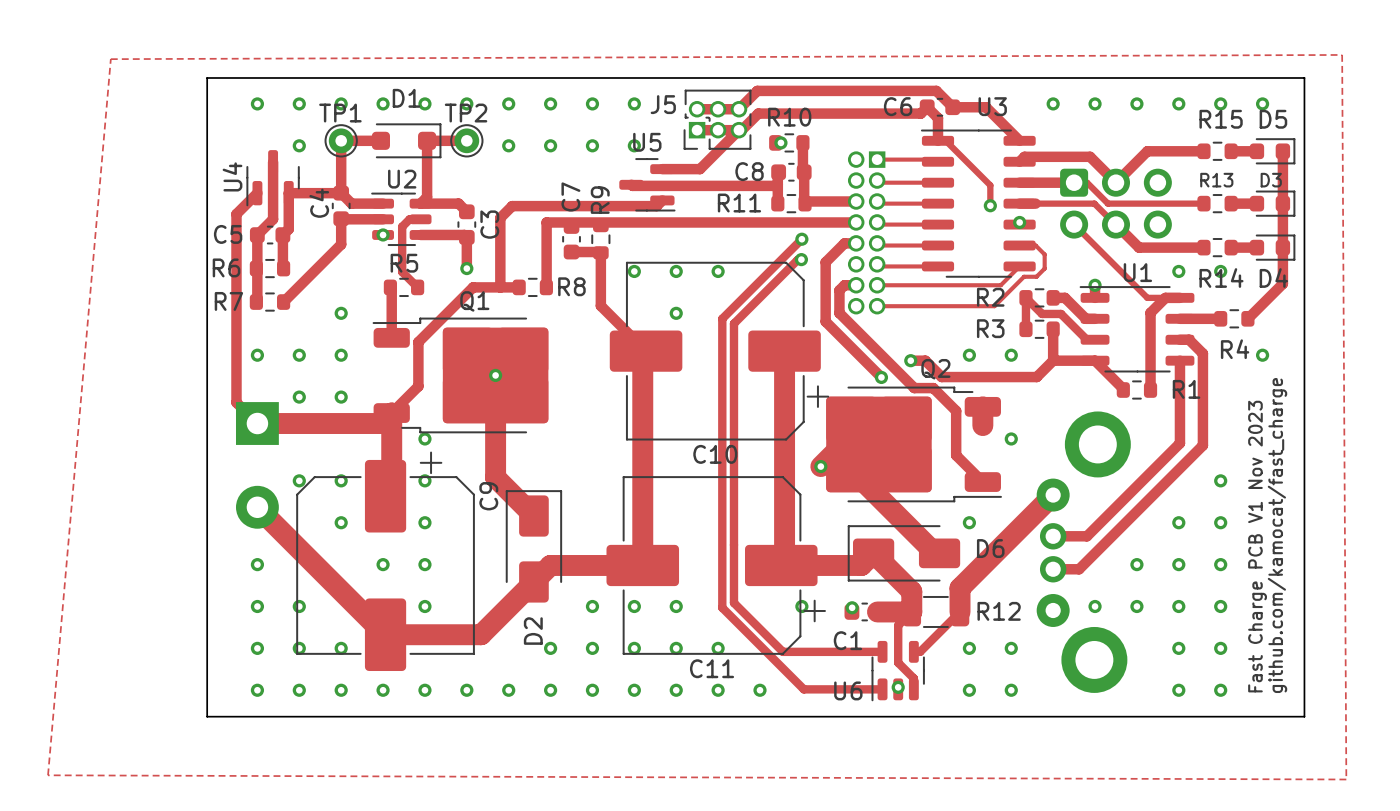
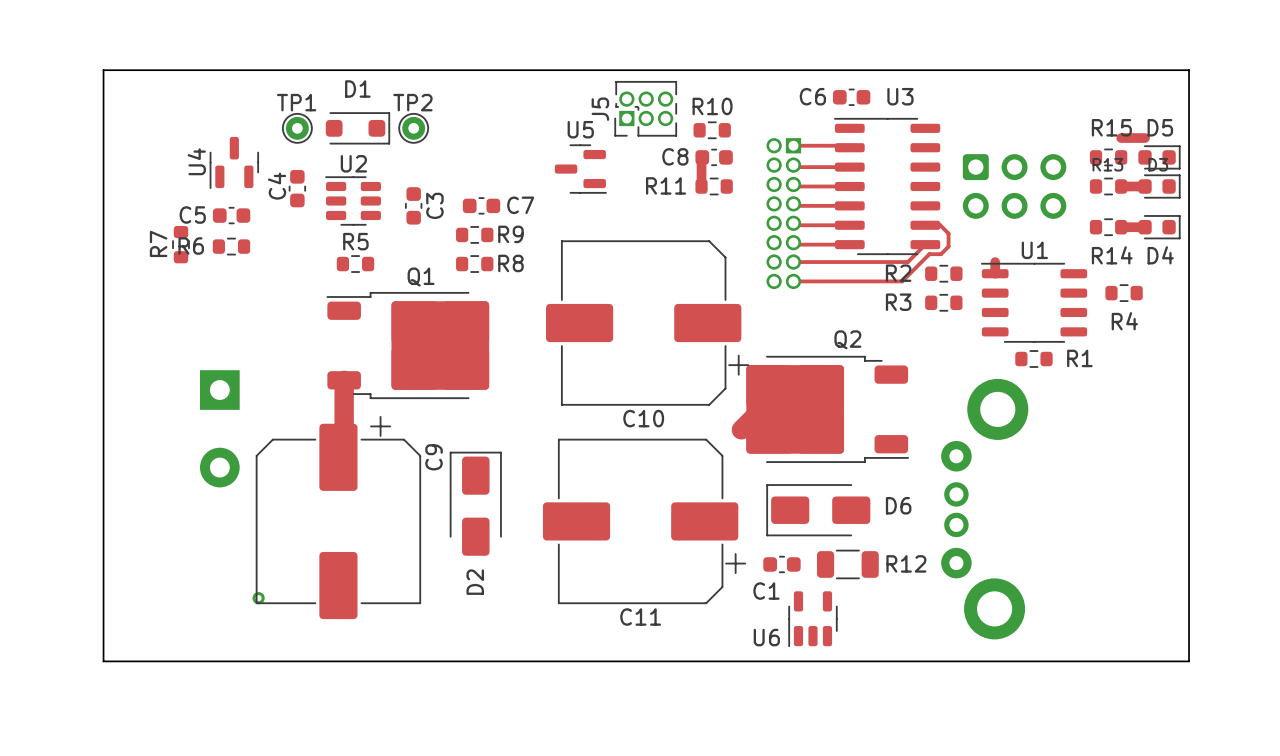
zone outline: (1342, 54) (110, 59) (48, 775) (1346, 779) (1342, 54) -> none
board edge: (207, 77) (207, 716) -> (173, 70) (103, 70) (103, 661) (173, 661)
via: (257, 103) -> none
via: (299, 103) -> none
via: (341, 103) -> none
via: (383, 103) -> none
via: (424, 103) -> none
via: (466, 103) -> none
via: (508, 103) -> none
via: (550, 103) -> none
via: (592, 103) -> none
via: (634, 103) -> none
via: (1053, 103) -> none
via: (1095, 103) -> none
via: (1136, 103) -> none
via: (1178, 103) -> none
via: (1220, 103) -> none
via: (1262, 103) -> none
J5 name rotation: 0° (663, 104) -> 90° counterclockwise (600, 109)
track: (697, 109) (738, 109) (757, 90) (936, 90) (952, 107) (986, 107) (1019, 140) -> none
track: (697, 130) (741, 130) (758, 113) (920, 113) (927, 107) (937, 118) (937, 140) (945, 140) (990, 185) (990, 205) -> none
track: (738, 130) (700, 169) (662, 169) -> none
track: (380, 140) (341, 140) (341, 193) -> none
track: (466, 140) (427, 140) (427, 197) (420, 203) (458, 203) (466, 211) -> none
via: (780, 142) -> none
track: (802, 142) (804, 202) (856, 201) -> none
via: (299, 145) -> none
via: (508, 145) -> none
via: (550, 145) -> none
via: (592, 145) -> none
via: (634, 145) -> none
track: (1203, 151) (1147, 151) (1115, 182) (1090, 156) (1024, 156) (1019, 161) -> none
R15 position: (1217, 151) -> (1108, 157)
D5 position: (1272, 151) -> (1159, 157)
track: (1282, 151) (1282, 283) (1247, 318) -> none
track: (273, 162) (273, 219) (257, 235) (256, 302) -> none
track: (1019, 182) (1087, 182) (1108, 203) (1203, 203) -> none
track: (631, 184) (777, 184) -> none
track: (257, 193) (236, 214) (236, 402) (257, 423) (381, 423) (418, 386) (418, 342) (473, 287) (519, 287) -> none
track: (341, 193) (288, 193) (288, 229) (281, 236) -> none
track: (341, 193) (351, 203) (383, 203) -> none
track: (662, 200) (656, 206) (512, 206) (500, 217) (500, 287) -> none
track: (1035, 203) (1019, 203) (1094, 203) (1139, 247) (1203, 247) -> none
via: (990, 205) -> none
track: (383, 219) (341, 218) (341, 244) (283, 302) -> none
track: (420, 219) (409, 219) (402, 226) (402, 271) (417, 287) -> none
track: (856, 222) (546, 222) (546, 287) -> none
via: (1019, 222) -> none
track: (1074, 224) (1147, 297) (1179, 297) (1165, 297) (1150, 312) (1150, 390) -> none
via: (383, 234) -> none
track: (420, 234) (464, 234) (466, 237) (466, 268) -> none
track: (282, 235) (283, 268) -> none
C7 rotation: 0° (571, 239) -> 90° clockwise (481, 205)
C7 position: (571, 239) -> (481, 205)
R9 rotation: 0° (600, 239) -> 90° clockwise (474, 234)
R9 position: (600, 239) -> (474, 234)
track: (801, 239) (722, 318) (722, 607) (803, 689) (882, 689) -> none
via: (801, 239) -> none
track: (856, 243) (844, 243) (825, 262) (825, 321) (881, 377) -> none
track: (571, 252) (600, 252) (600, 305) (646, 351) (642, 354) (642, 565) (550, 565) (481, 634) (384, 634) (257, 507) -> none
track: (801, 259) (797, 259) (733, 323) (733, 602) (782, 651) (882, 651) -> none
via: (801, 259) -> none
via: (466, 268) -> none
via: (634, 271) -> none
via: (676, 271) -> none
via: (718, 271) -> none
via: (1178, 271) -> none
via: (1220, 271) -> none
track: (856, 285) (844, 285) (839, 290) (839, 313) (914, 388) (933, 388) (956, 410) (956, 455) (982, 482) -> none
via: (1095, 285) -> none
track: (390, 287) (391, 337) -> none
track: (1053, 297) (1064, 297) (1085, 318) (1095, 318) -> none
R7 rotation: 0° (269, 302) -> 90° clockwise (180, 244)
R7 position: (269, 302) -> (180, 244)
via: (341, 313) -> none
via: (676, 313) -> none
track: (1179, 318) (1220, 318) -> none
track: (1025, 329) (1027, 299) (1042, 313) (1061, 313) (1086, 339) (1095, 339) -> none
track: (1053, 329) (1053, 360) -> none
track: (1179, 339) (1189, 339) (1202, 353) (1202, 445) (1079, 569) (1053, 569) -> none
track: (784, 351) (784, 562) (781, 565) (861, 565) (873, 553) (911, 591) (911, 611) -> none
via: (257, 355) -> none
via: (299, 355) -> none
via: (341, 355) -> none
via: (969, 355) -> none
via: (1011, 355) -> none
via: (1262, 355) -> none
track: (910, 360) (925, 360) (941, 377) (1036, 377) (1053, 360) -> none
via: (910, 360) -> none
track: (1053, 360) (1095, 360) (1123, 390) -> none
track: (1179, 360) (1179, 443) (1086, 536) (1053, 536) -> none
track: (495, 375) (495, 477) (533, 516) -> none
via: (495, 375) -> none
via: (881, 377) -> none
via: (299, 397) -> none
via: (341, 397) -> none
track: (982, 406) (982, 425) -> none
via: (424, 438) -> none
via: (1011, 438) -> none
via: (820, 466) -> none
track: (851, 469) (935, 553) (939, 553) -> none
via: (299, 480) -> none
via: (341, 480) -> none
via: (424, 480) -> none
via: (1220, 480) -> none
track: (1053, 495) (960, 588) (960, 611) (920, 651) (913, 651) -> none
via: (341, 522) -> none
via: (424, 522) -> none
via: (969, 522) -> none
via: (1178, 522) -> none
via: (1220, 522) -> none
text: github.com/kamocat/fast_charge (1277, 535) -> none
text: Fast Charge PCB V1 Nov 2023 (1257, 546) -> none
via: (257, 564) -> none
via: (383, 564) -> none
via: (424, 564) -> none
via: (1136, 564) -> none
via: (1178, 564) -> none
via: (1220, 564) -> none
via: (257, 606) -> none
via: (299, 606) -> none
via: (424, 606) -> none
via: (592, 606) -> none
via: (634, 606) -> none
via: (676, 606) -> none
via: (801, 606) -> none
via: (1095, 606) -> none
via: (1136, 606) -> none
via: (1178, 606) -> none
via: (1220, 606) -> none
via: (852, 607) -> none
track: (877, 611) (911, 611) -> none
track: (911, 611) (898, 625) (898, 662) (913, 678) (913, 689) -> none
via: (257, 648) -> none
via: (341, 648) -> none
via: (550, 648) -> none
via: (592, 648) -> none
via: (634, 648) -> none
via: (676, 648) -> none
via: (718, 648) -> none
via: (969, 648) -> none
via: (1011, 648) -> none
via: (1178, 648) -> none
via: (1220, 648) -> none
via: (898, 687) -> none
via: (257, 690) -> none
via: (299, 690) -> none
via: (341, 690) -> none
via: (383, 690) -> none
via: (424, 690) -> none
via: (466, 690) -> none
via: (508, 690) -> none
via: (550, 690) -> none
via: (592, 690) -> none
via: (634, 690) -> none
via: (676, 690) -> none
via: (718, 690) -> none
via: (760, 690) -> none
via: (969, 690) -> none
via: (1011, 690) -> none
via: (1178, 690) -> none
via: (1220, 690) -> none

